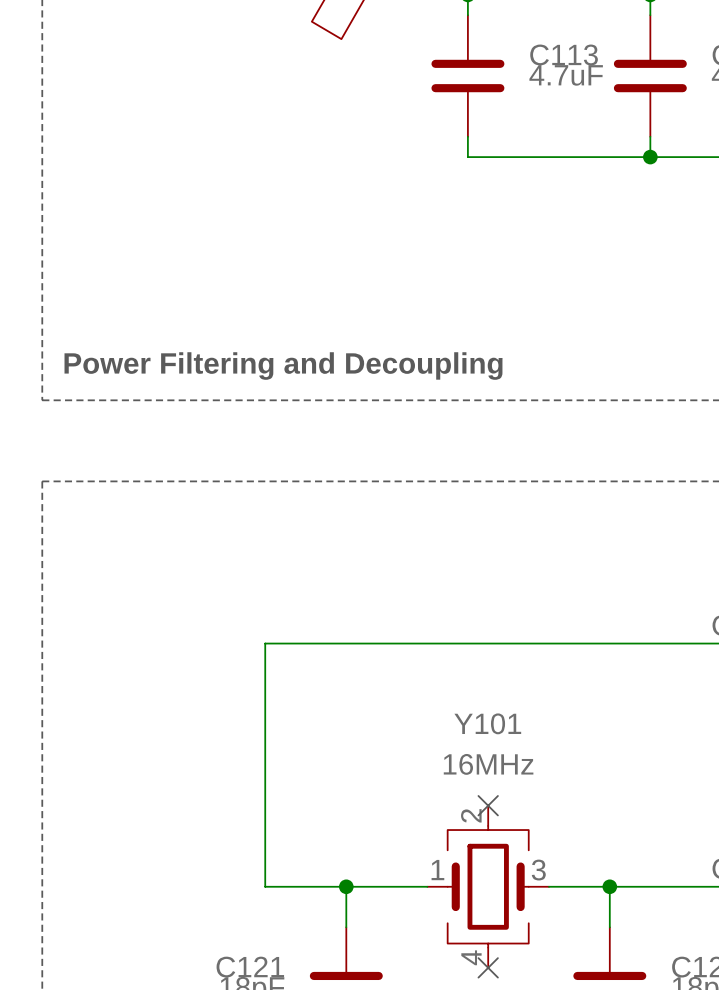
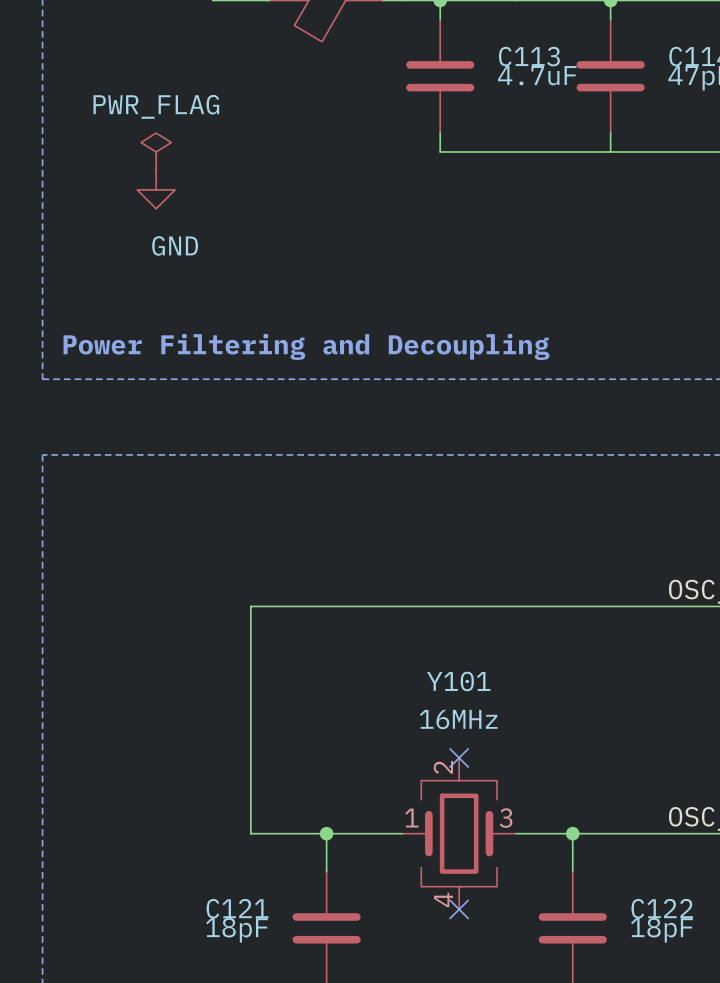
power symbol: none -> PWR_FLAG (156, 151)
junction: (650, 157) -> none
power symbol: none -> GND (156, 189)

